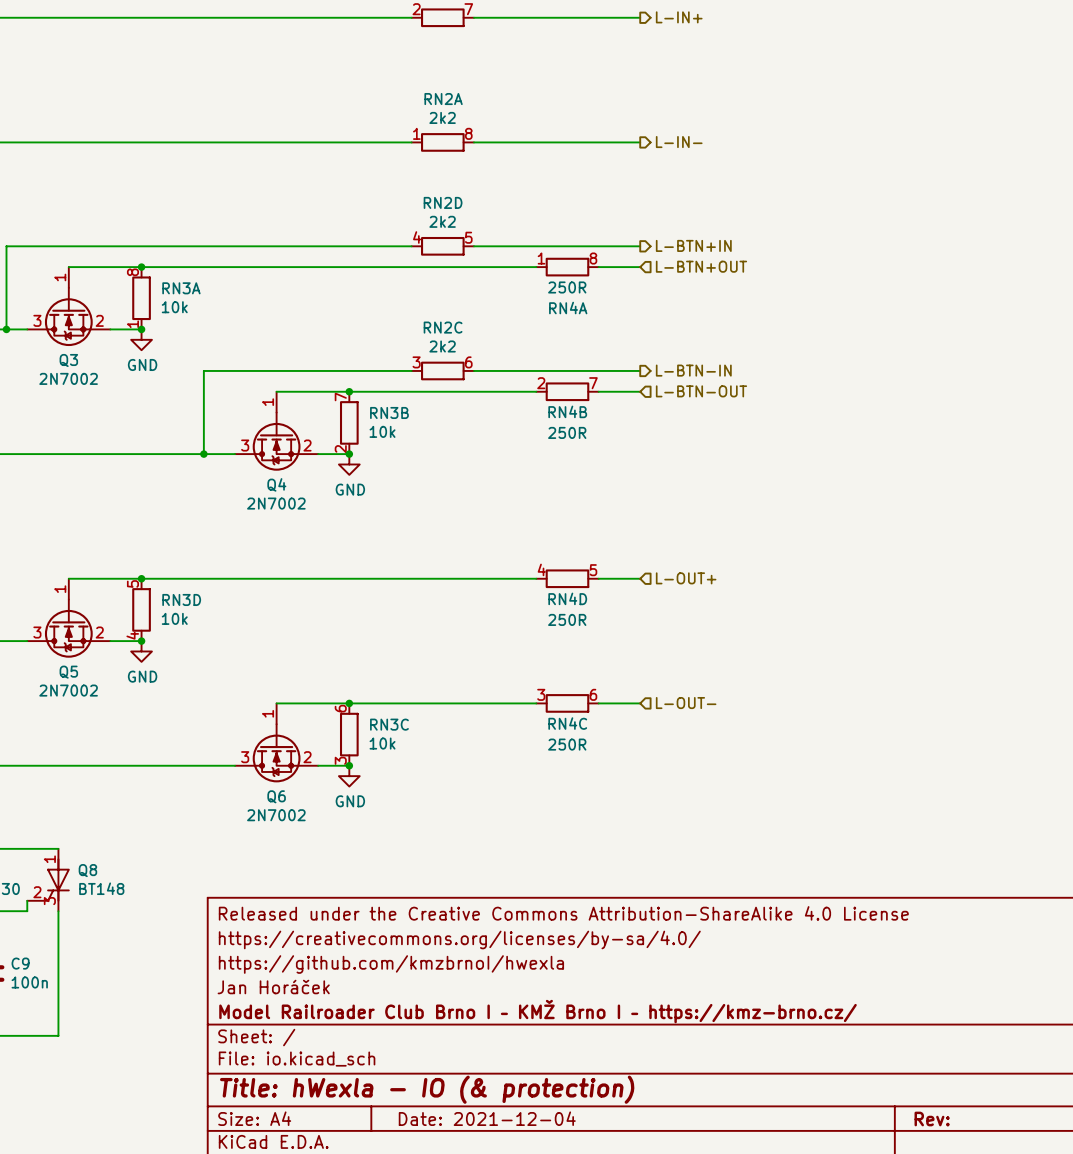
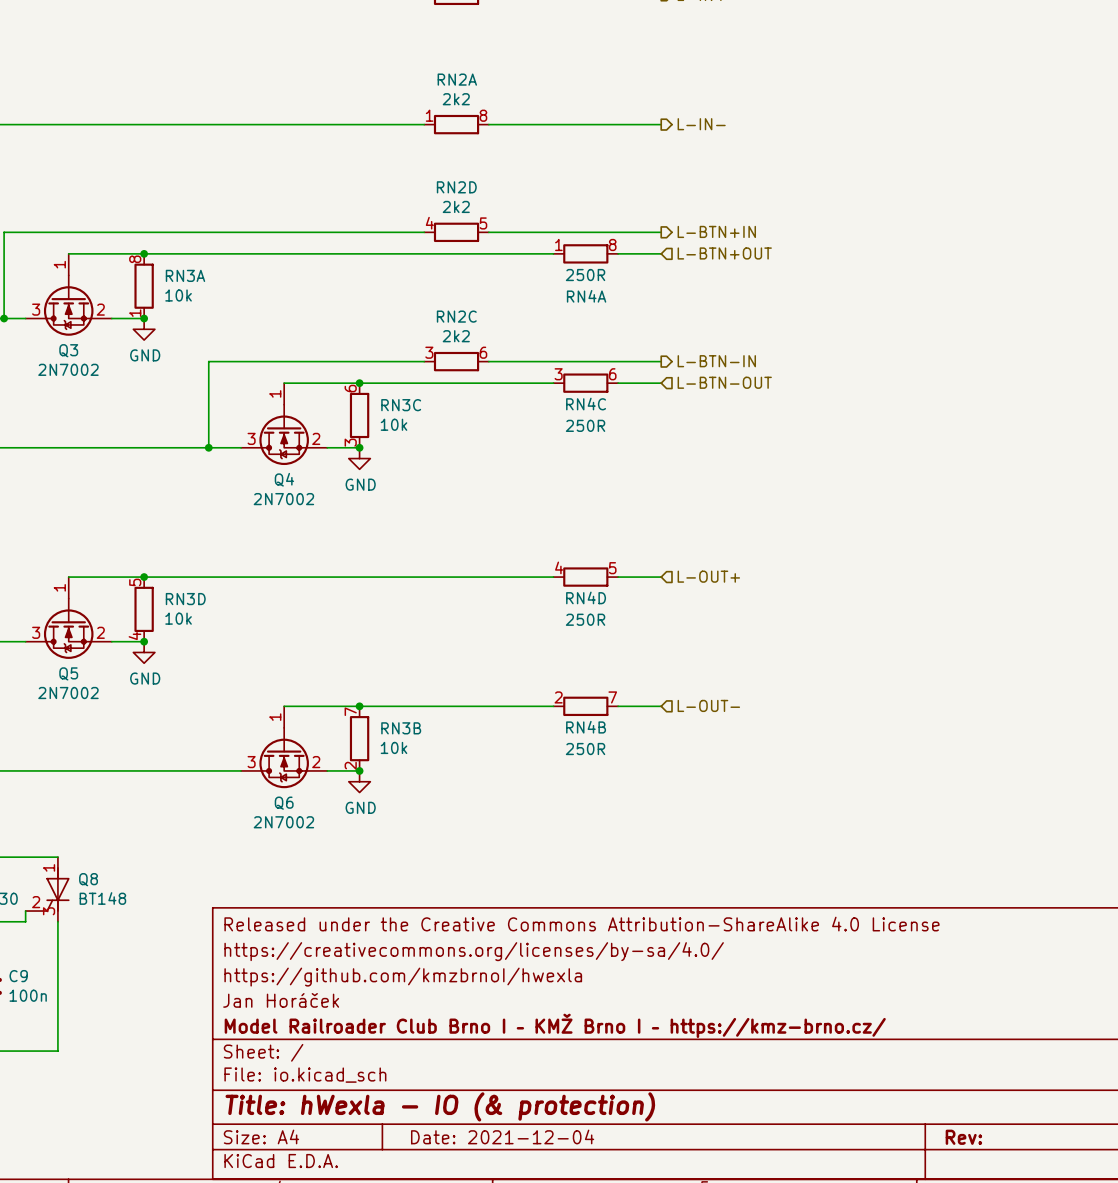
RN4B position: (567, 391) -> (585, 706)
RN3B position: (349, 422) -> (359, 738)
RN4C position: (567, 703) -> (585, 383)
RN3C position: (349, 734) -> (359, 415)

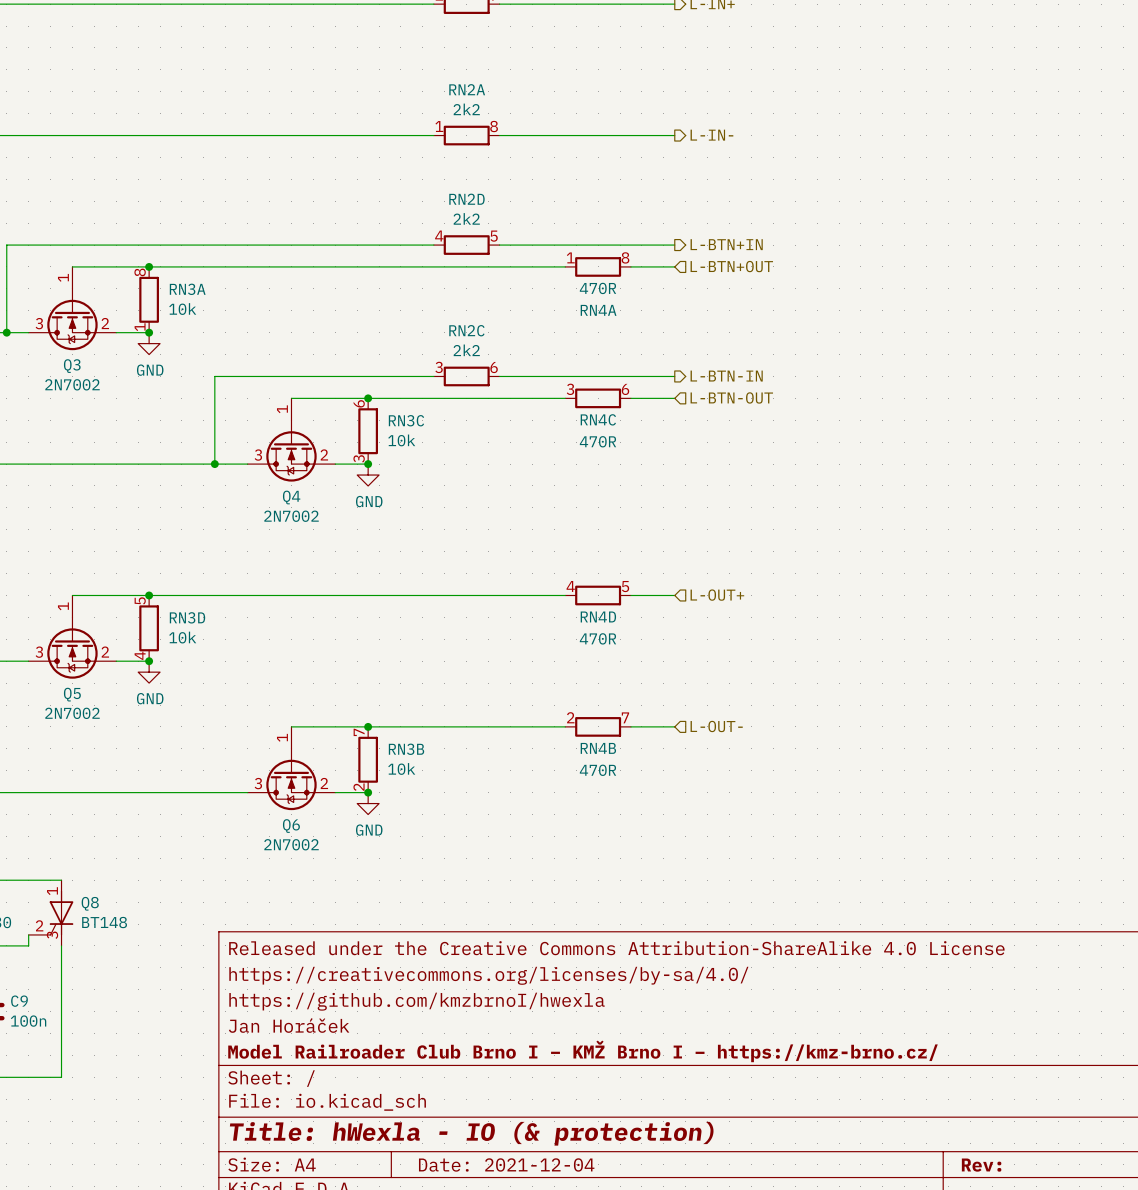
RN4A value: 250R (585, 275) -> 470R (597, 288)
RN4C value: 250R (585, 425) -> 470R (597, 441)
RN4D value: 250R (585, 619) -> 470R (597, 638)
RN4B value: 250R (585, 749) -> 470R (597, 770)

